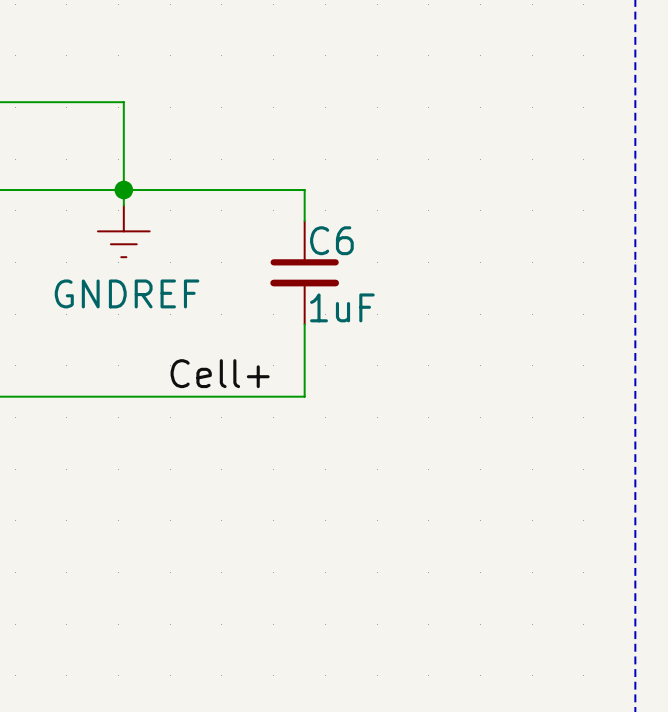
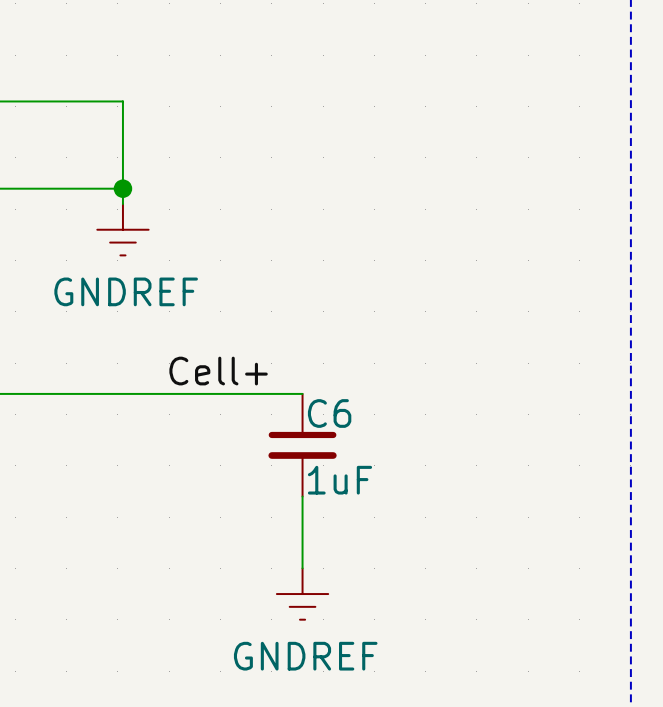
wire: (123, 190) (304, 190) (304, 221) -> none
C6 position: (304, 272) -> (302, 445)
wire: (304, 324) (304, 396) -> (302, 496) (302, 568)
power symbol: none -> GNDREF (302, 594)

